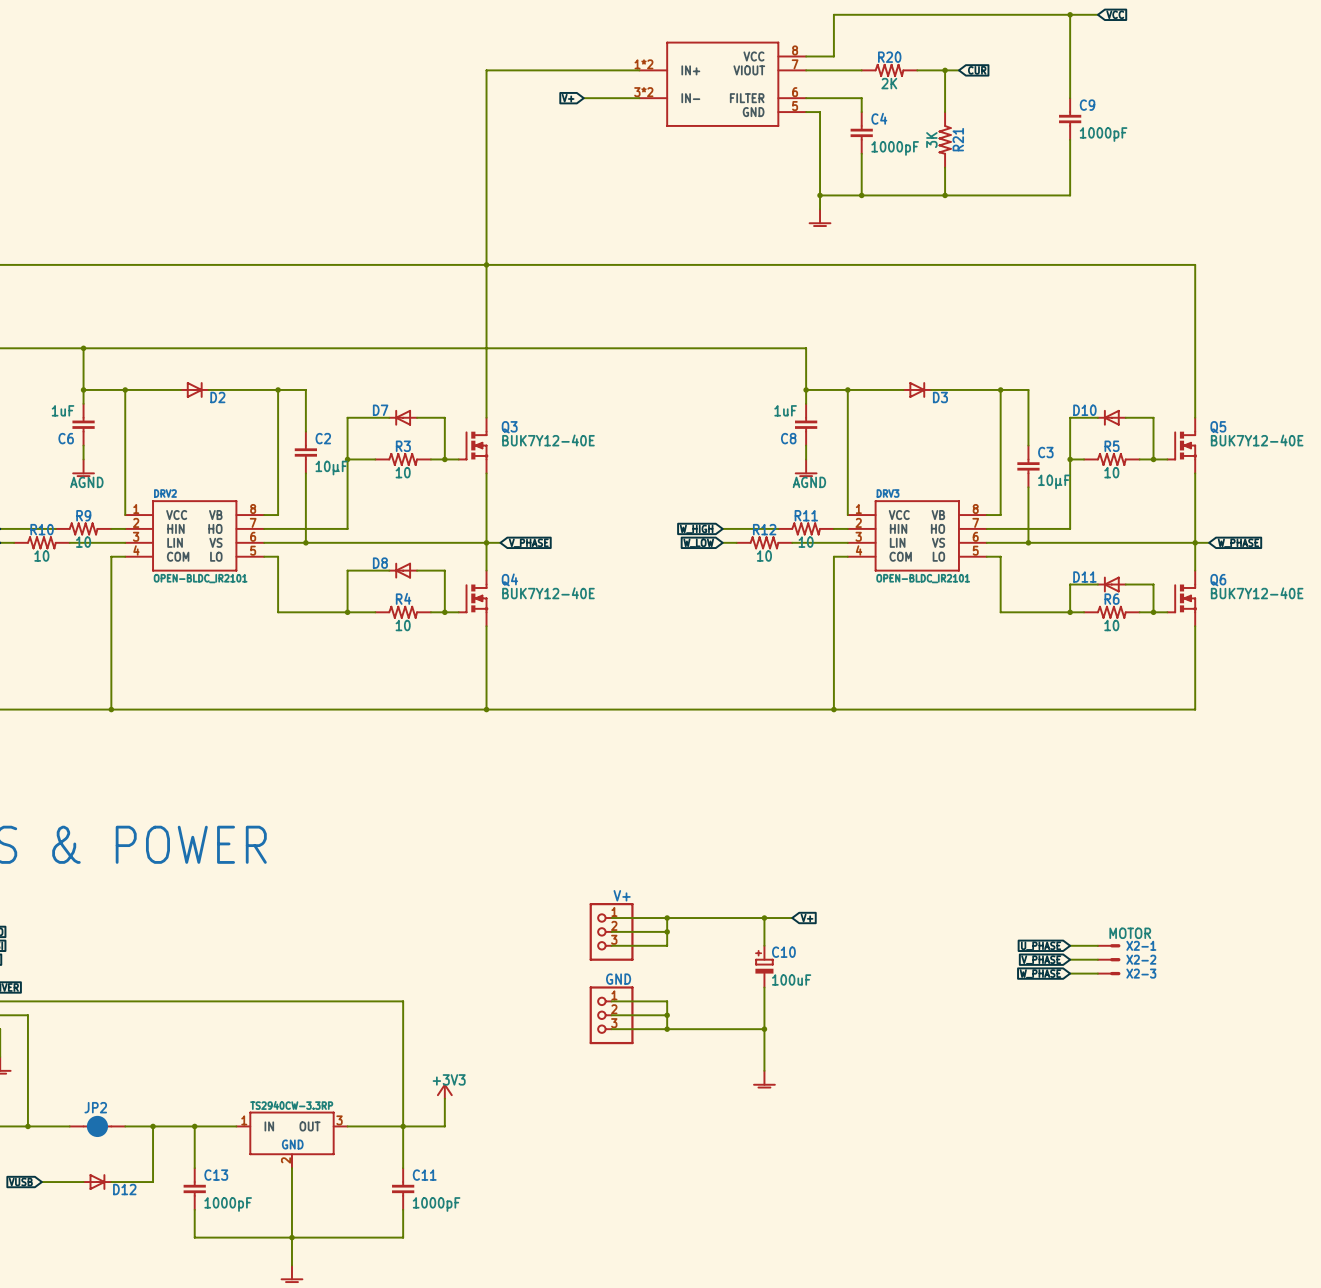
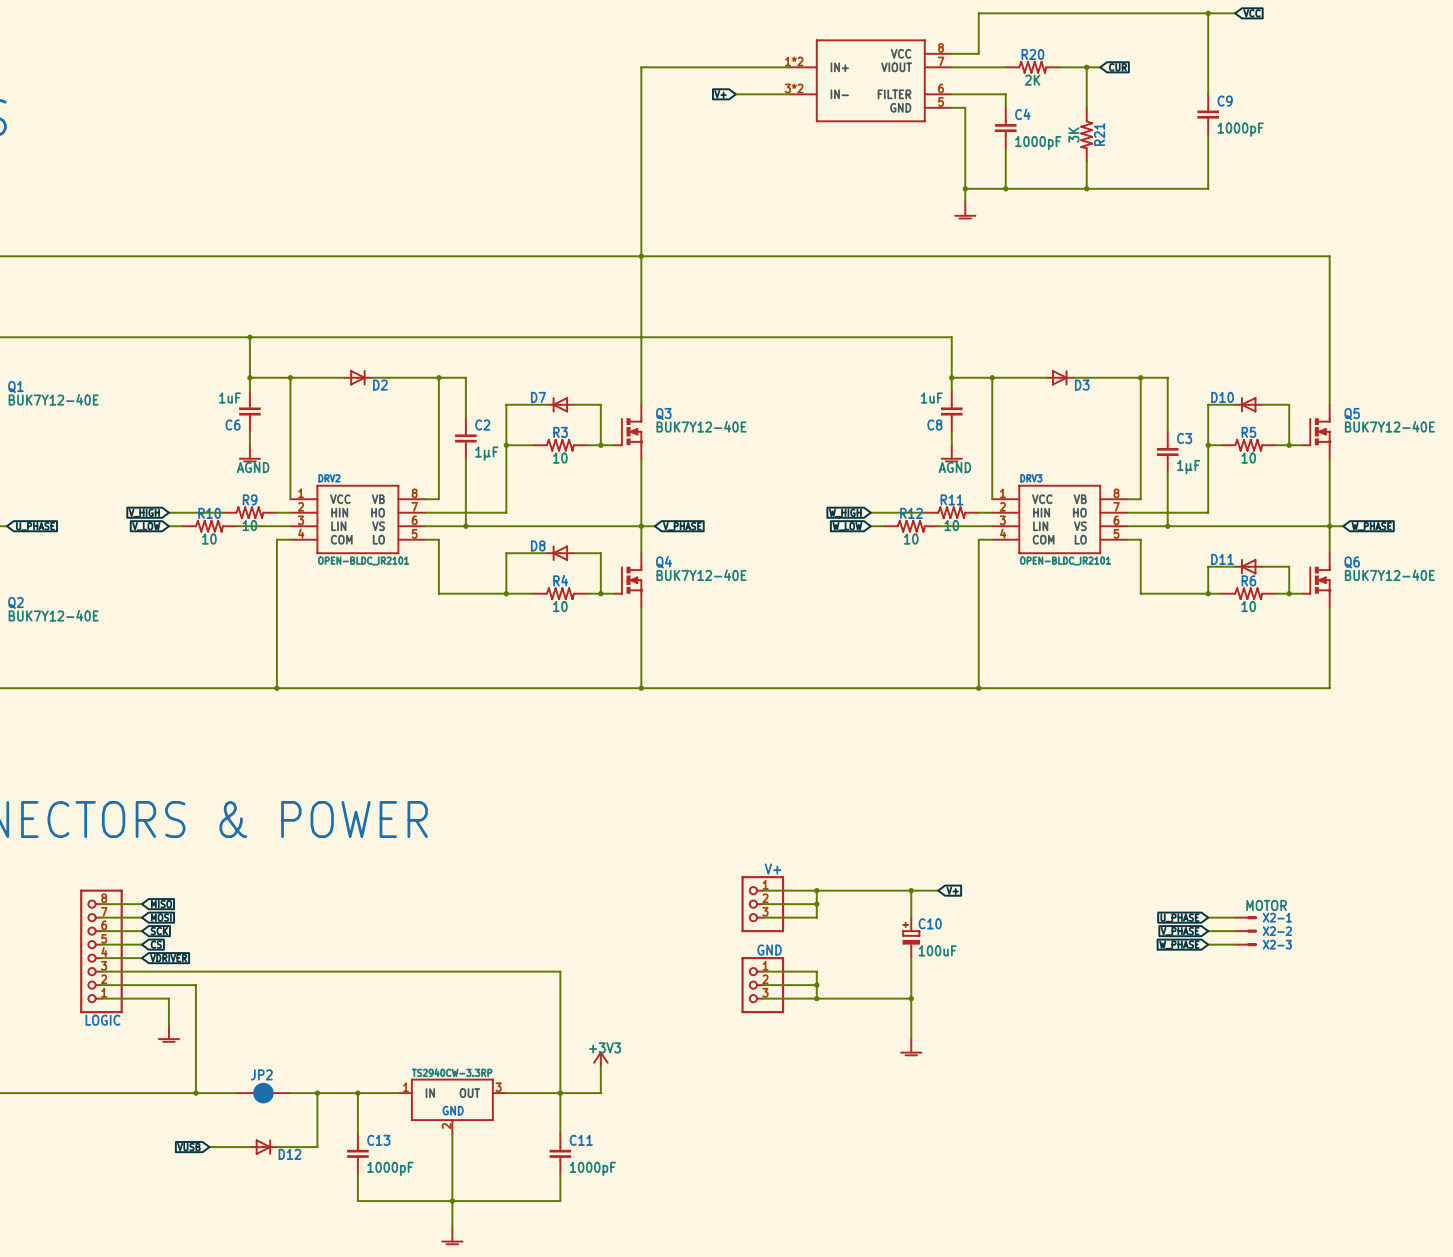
C2 value: 10µF (331, 468) -> 1µF (486, 453)
C3 value: 10µF (1054, 481) -> 1µF (1188, 467)

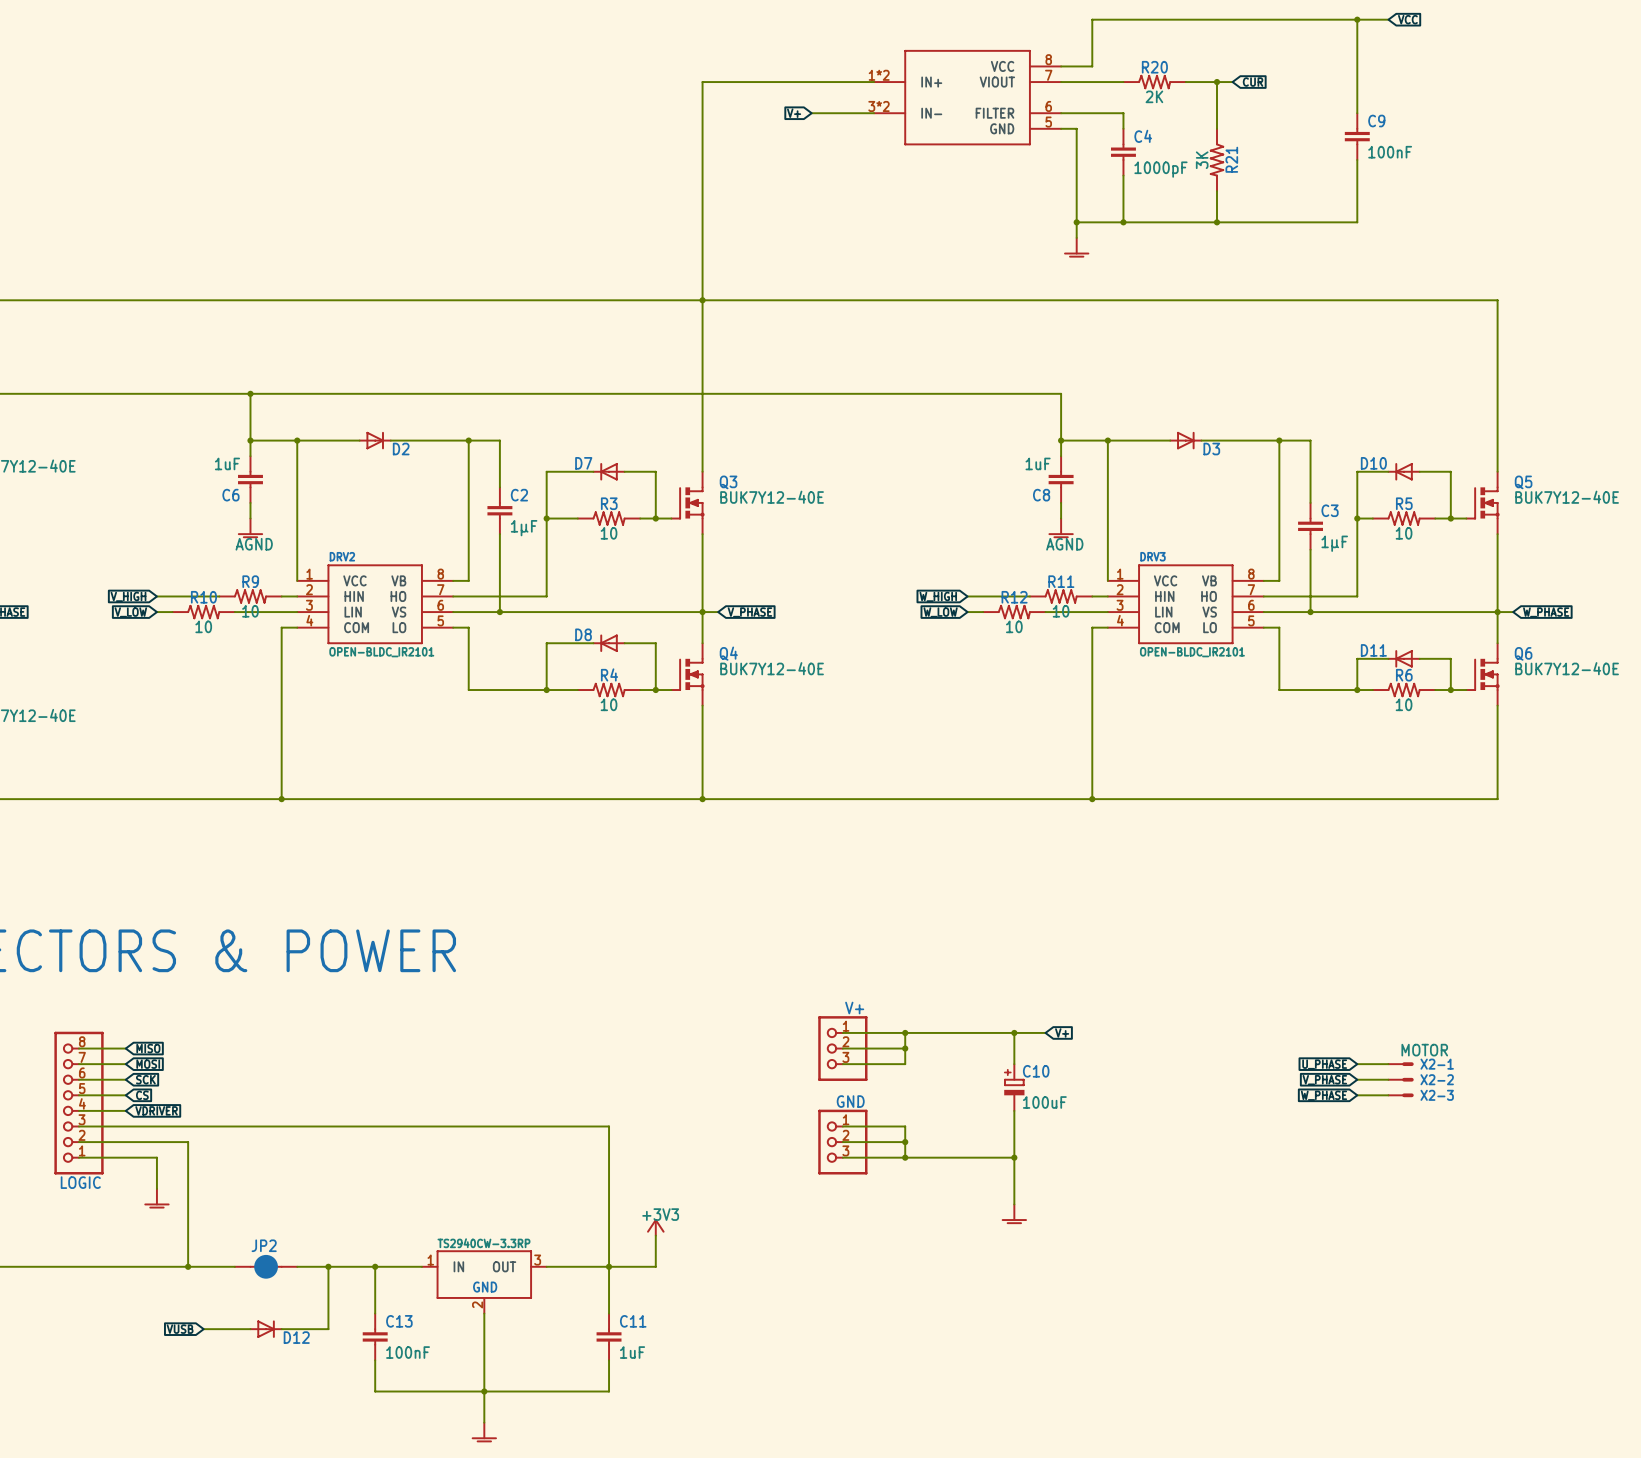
C9 value: 1000pF (1240, 129) -> 100nF (1390, 152)
C13 value: 1000pF (390, 1168) -> 100nF (408, 1352)
C11 value: 1000pF (592, 1168) -> 1uF (632, 1352)

